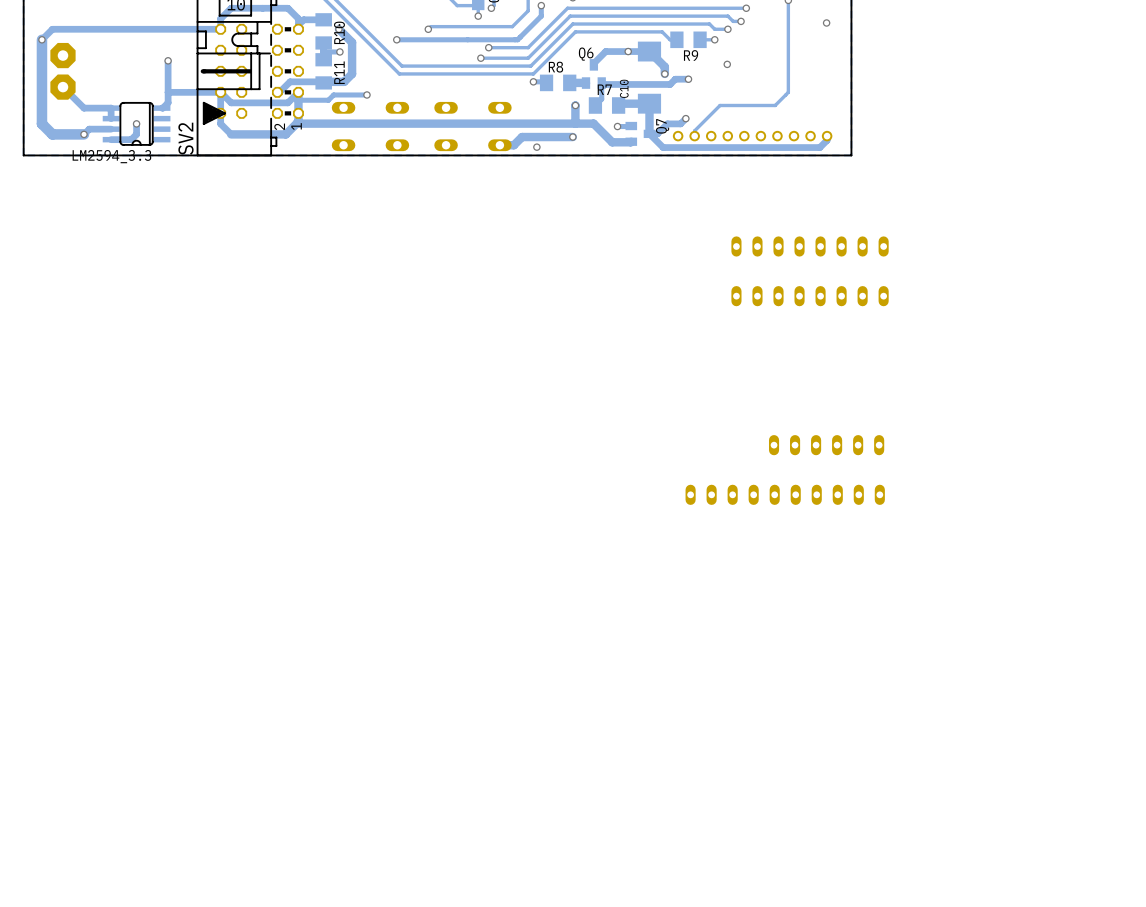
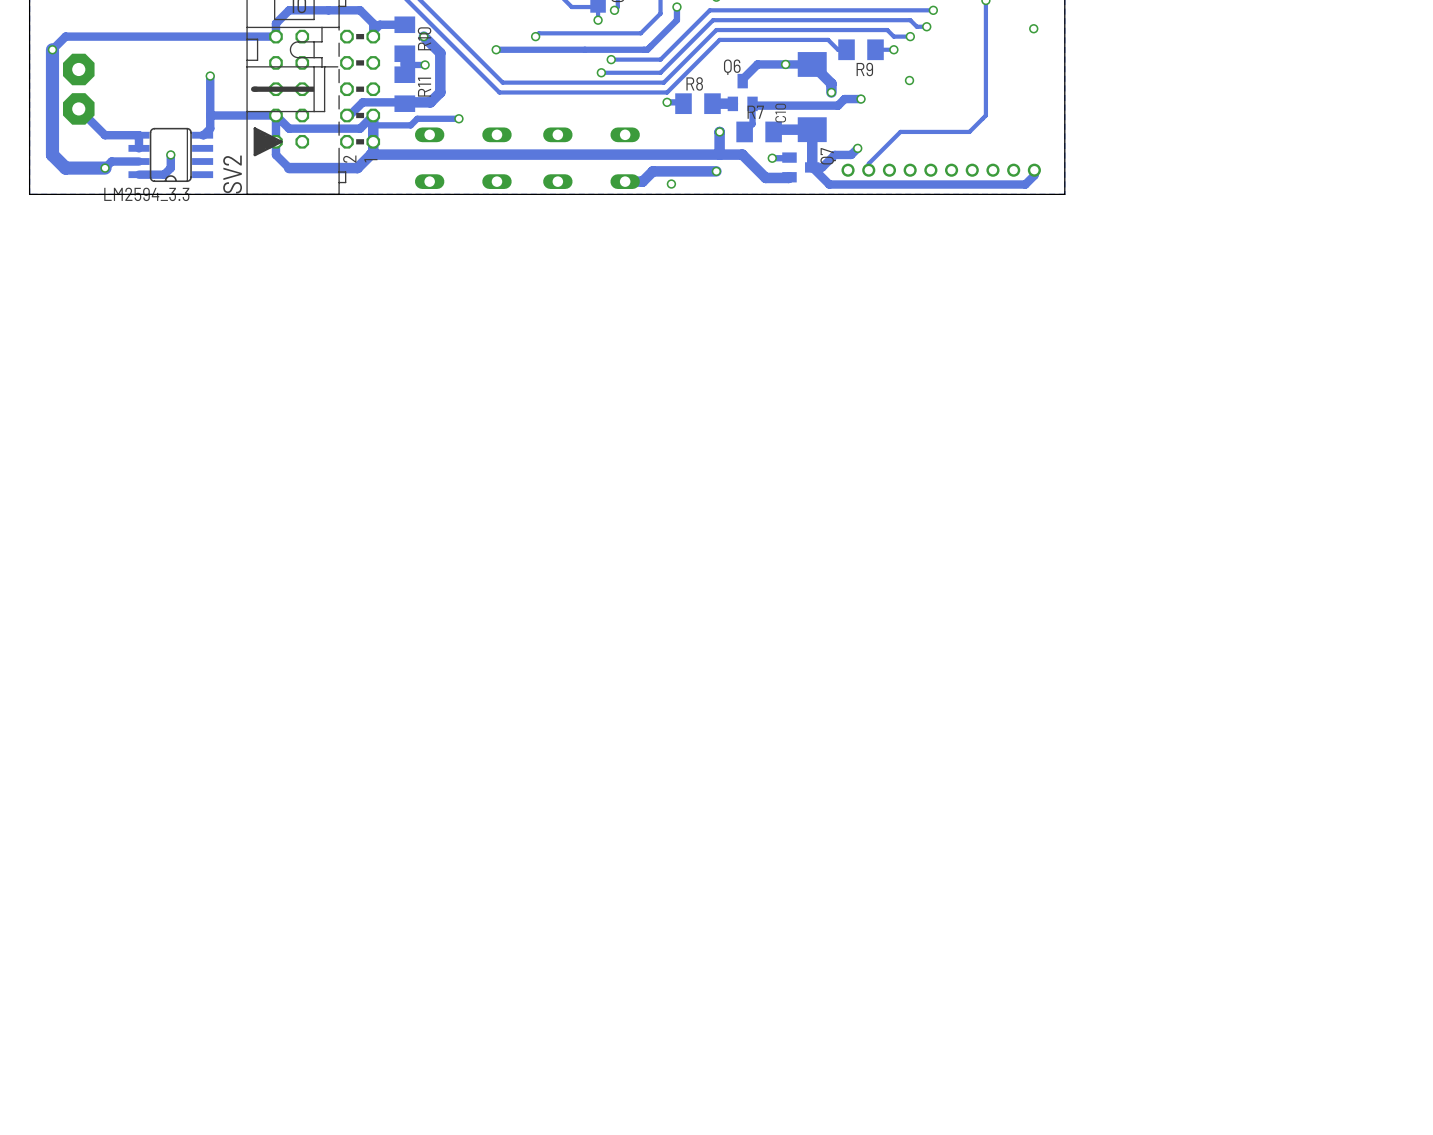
part: (810, 246) -> none
part: (810, 296) -> none
part: (826, 445) -> none
part: (785, 494) -> none

